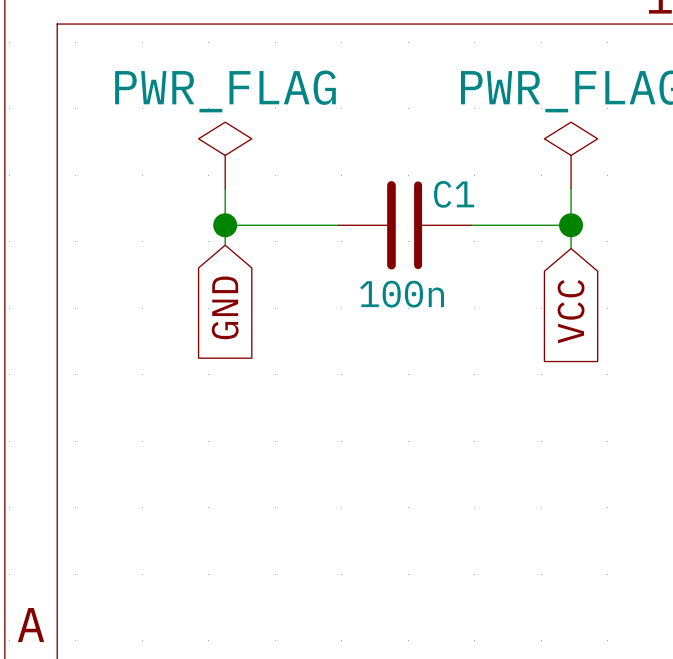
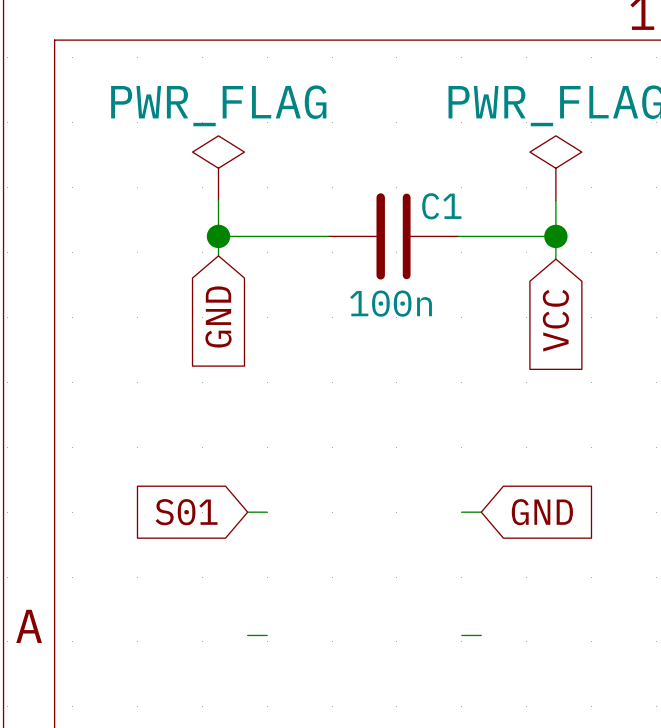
global label: none -> S01 (186, 512)
wire: none -> (247, 512) (267, 512)
wire: none -> (461, 512) (481, 512)
global label: none -> GND (542, 512)
wire: none -> (247, 635) (267, 635)
wire: none -> (461, 635) (481, 635)

